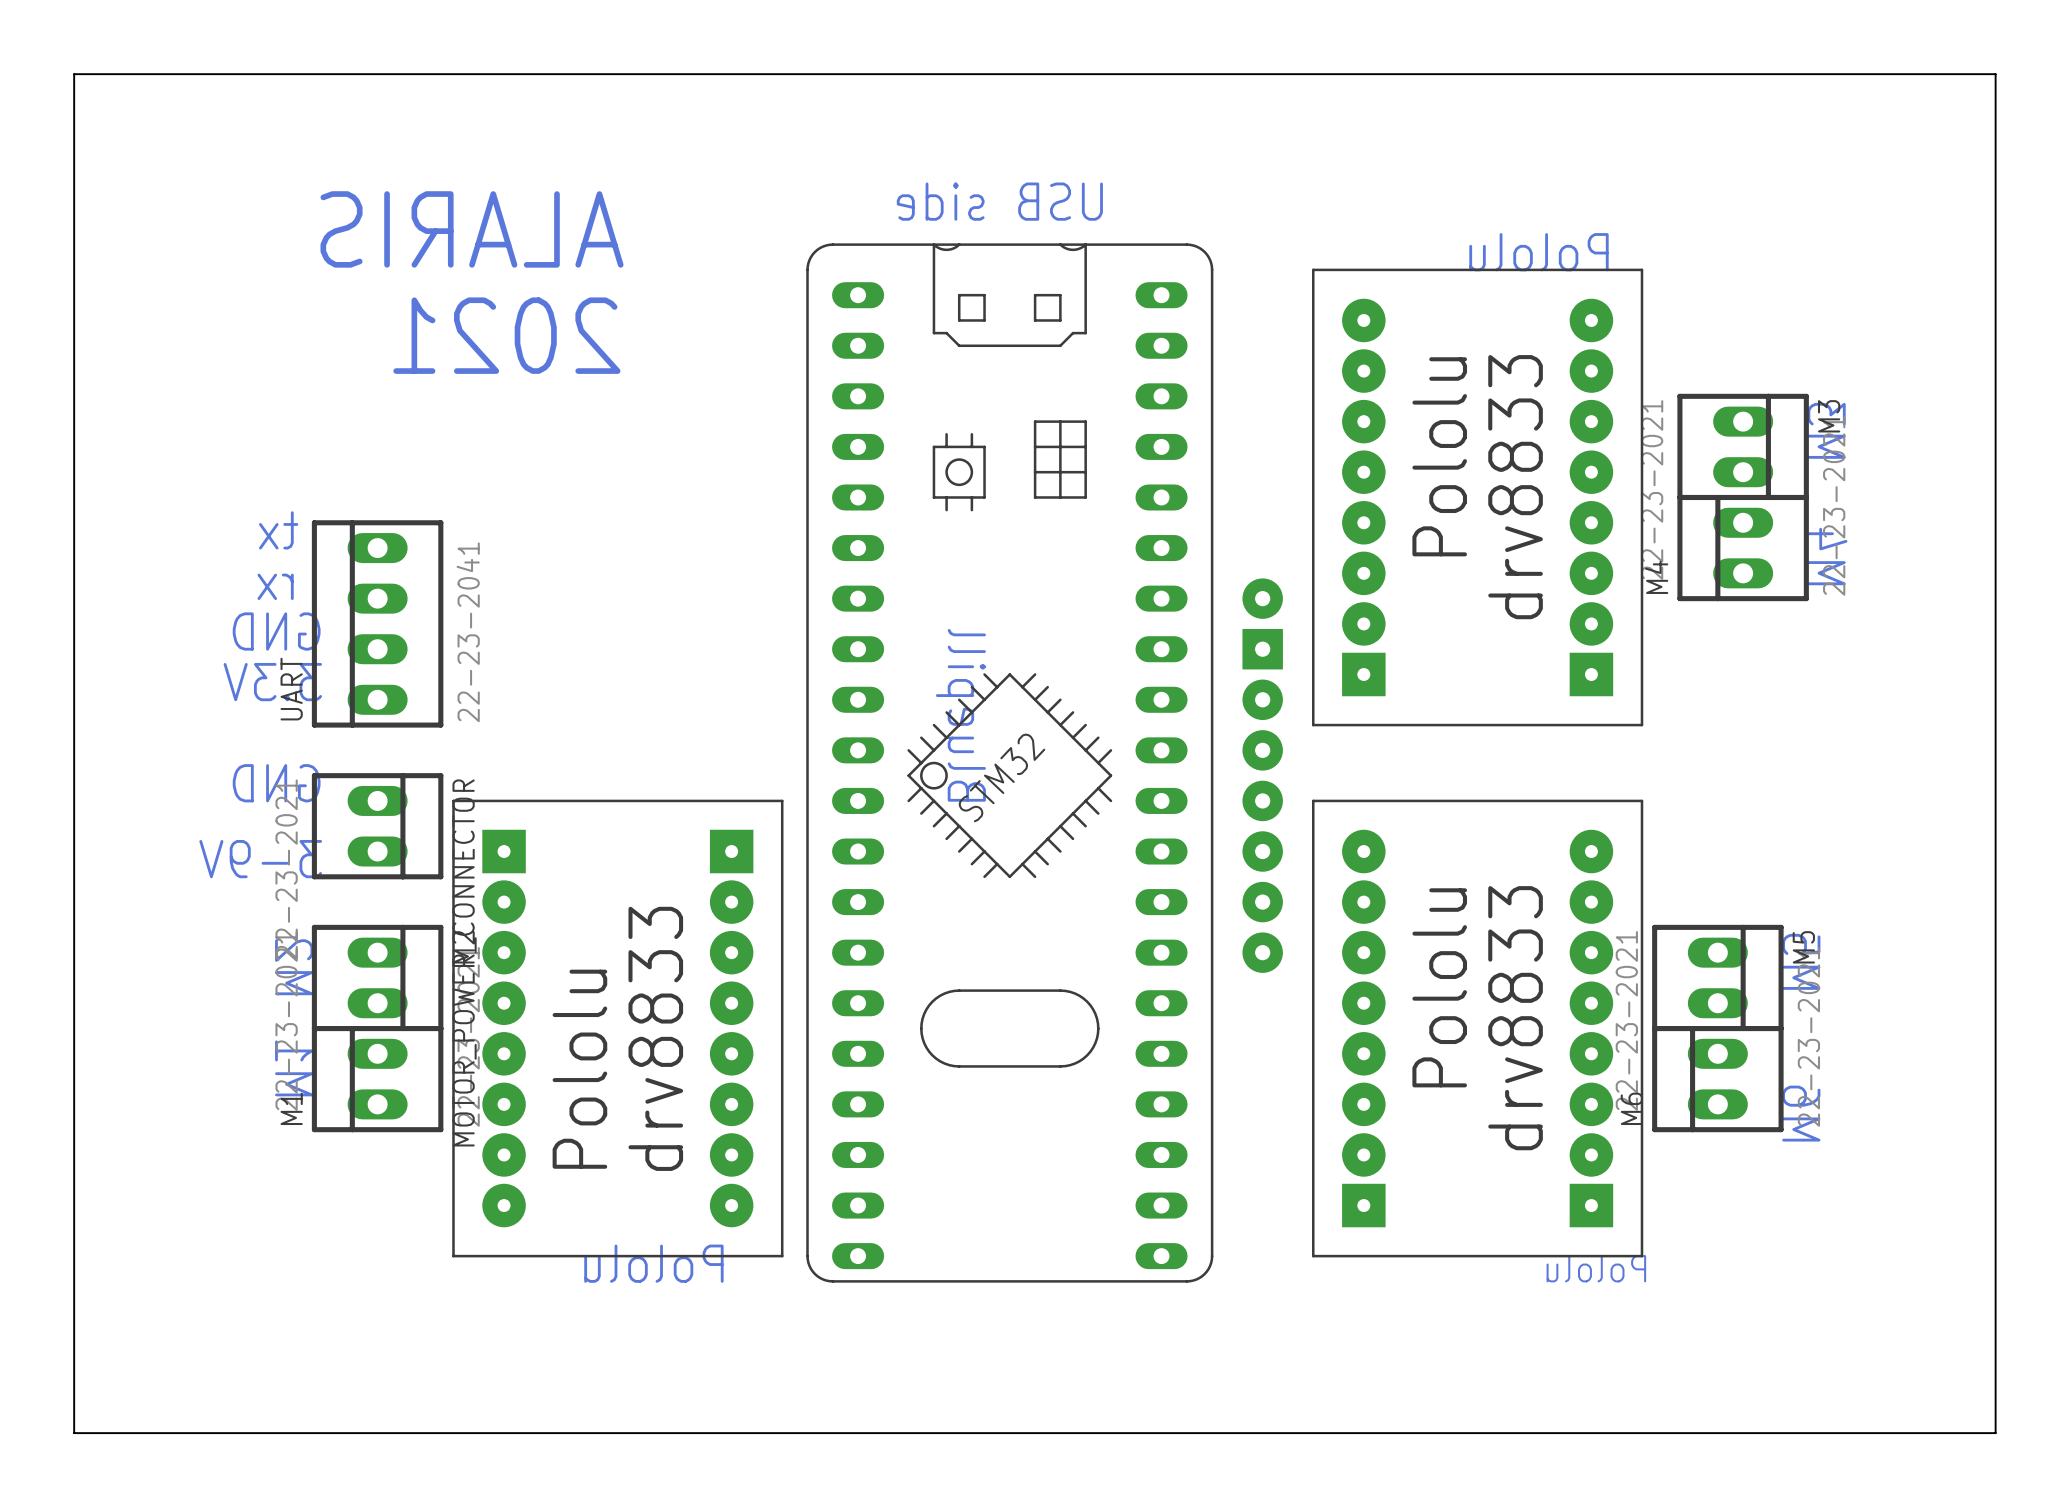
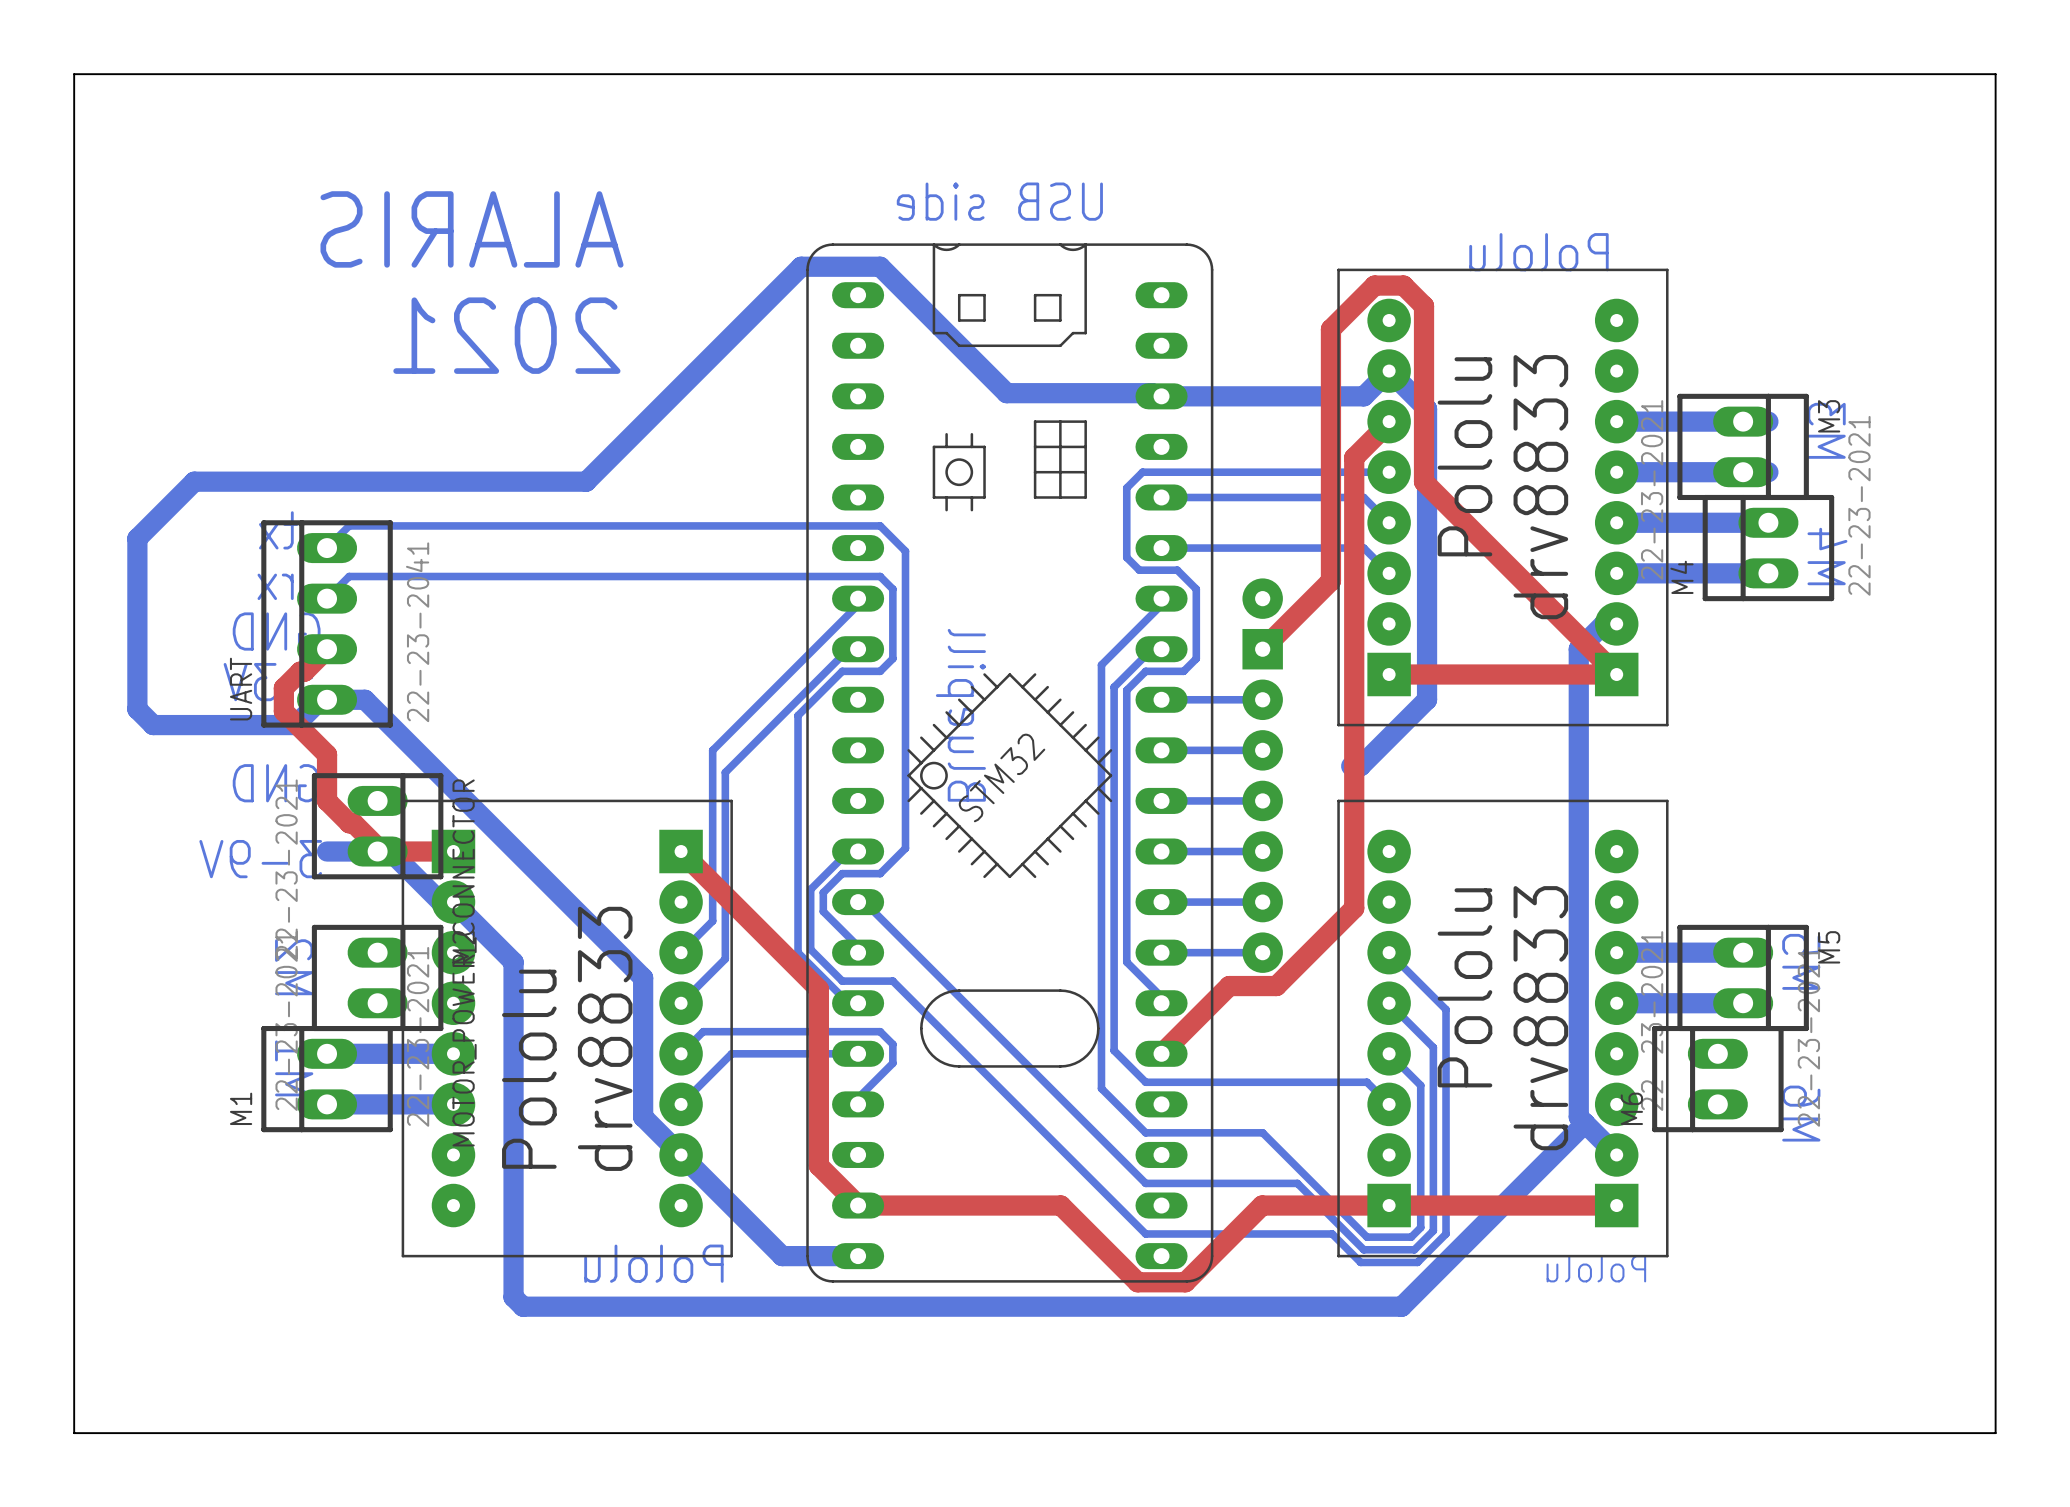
top track: none -> (1389, 421) (1354, 457) (1354, 908) (1276, 986) (1229, 986) (1161, 1053)
bottom track: none -> (1616, 421) (1768, 421)
bottom track: none -> (1389, 472) (1142, 472) (1126, 488) (1126, 557) (1139, 570) (1177, 570) (1196, 589) (1196, 658) (1183, 671) (1145, 671) (1126, 690) (1126, 962) (1161, 996) (1161, 1003)
bottom track: none -> (1616, 472) (1768, 472)
bottom track: none -> (1161, 497) (1363, 497) (1389, 522)
part position: (1477, 497) -> (1502, 497)
bottom track: none -> (1616, 522) (1768, 522)
bottom track: none -> (327, 548) (349, 525) (880, 525) (905, 551) (905, 848) (880, 873) (842, 873) (823, 892) (823, 911) (858, 946) (858, 952)
bottom track: none -> (1161, 548) (1363, 548) (1389, 573)
M4 position: (1743, 548) -> (1768, 548)
bottom track: none -> (1616, 573) (1768, 573)
bottom track: none -> (327, 598) (349, 576) (880, 576) (892, 589) (892, 658) (880, 671) (842, 671) (798, 715) (798, 952) (848, 1003) (858, 1003)
bottom track: none -> (858, 598) (858, 604) (712, 750) (712, 921) (681, 952)
bottom track: none -> (1161, 598) (1161, 604) (1101, 665) (1101, 1088) (1145, 1132) (1262, 1132) (1366, 1237) (1411, 1237) (1420, 1227) (1420, 1085) (1389, 1053)
UART position: (377, 623) -> (327, 623)
bottom track: none -> (1616, 623) (1604, 623) (1578, 649) (1578, 1117) (1616, 1154)
top track: none -> (327, 649) (304, 671) (300, 671) (283, 688) (283, 711) (327, 754) (327, 800) (349, 823) (353, 823) (381, 851) (453, 851)
bottom track: none -> (858, 649) (848, 649) (725, 772) (725, 958) (681, 1003)
bottom track: none -> (1161, 649) (1152, 649) (1114, 687) (1114, 1050) (1145, 1082) (1366, 1082) (1389, 1104)
top track: none -> (1262, 649) (1330, 580) (1330, 329) (1374, 285) (1403, 285) (1424, 306) (1424, 481) (1616, 674) (1389, 674)
bottom track: none -> (1161, 699) (1262, 699)
bottom track: none -> (1161, 750) (1262, 750)
bottom track: none -> (1351, 766) (1360, 766) (1427, 699) (1427, 408) (1389, 371) (1363, 396) (1161, 396) (1152, 393) (1006, 393) (880, 266) (801, 266) (586, 481) (194, 481) (137, 538) (137, 709) (153, 725) (295, 725) (317, 702) (327, 699) (364, 699) (643, 977) (643, 1117) (782, 1256) (858, 1256)
bottom track: none -> (1161, 800) (1262, 800)
bottom track: none -> (327, 851) (390, 851) (440, 902) (453, 902) (513, 962) (513, 1297) (523, 1306) (1401, 1306) (1585, 1123)
top track: none -> (681, 851) (818, 989) (818, 1165) (858, 1205) (1060, 1205) (1137, 1282) (1185, 1282) (1262, 1205) (1616, 1205)
bottom track: none -> (858, 851) (848, 851) (810, 889) (810, 949) (842, 981) (892, 981) (1145, 1233) (1332, 1233) (1360, 1262) (1417, 1262) (1446, 1233) (1446, 1009) (1389, 952)
bottom track: none -> (1161, 851) (1262, 851)
bottom track: none -> (858, 902) (864, 902) (1145, 1183) (1297, 1183) (1363, 1249) (1414, 1249) (1433, 1230) (1433, 1047) (1389, 1003)
bottom track: none -> (1161, 902) (1262, 902)
bottom track: none -> (1161, 952) (1262, 952)
bottom track: none -> (1616, 952) (1743, 952)
M5 position: (1717, 977) -> (1743, 977)
bottom track: none -> (1616, 1003) (1743, 1003)
part position: (617, 1028) -> (567, 1028)
part position: (1477, 1028) -> (1502, 1028)
bottom track: none -> (327, 1053) (453, 1053)
bottom track: none -> (681, 1053) (703, 1031) (880, 1031) (892, 1044) (892, 1063) (858, 1098) (858, 1104)
bottom track: none -> (858, 1053) (731, 1053) (681, 1104)
M1 position: (377, 1079) -> (327, 1079)
bottom track: none -> (327, 1104) (453, 1104)

